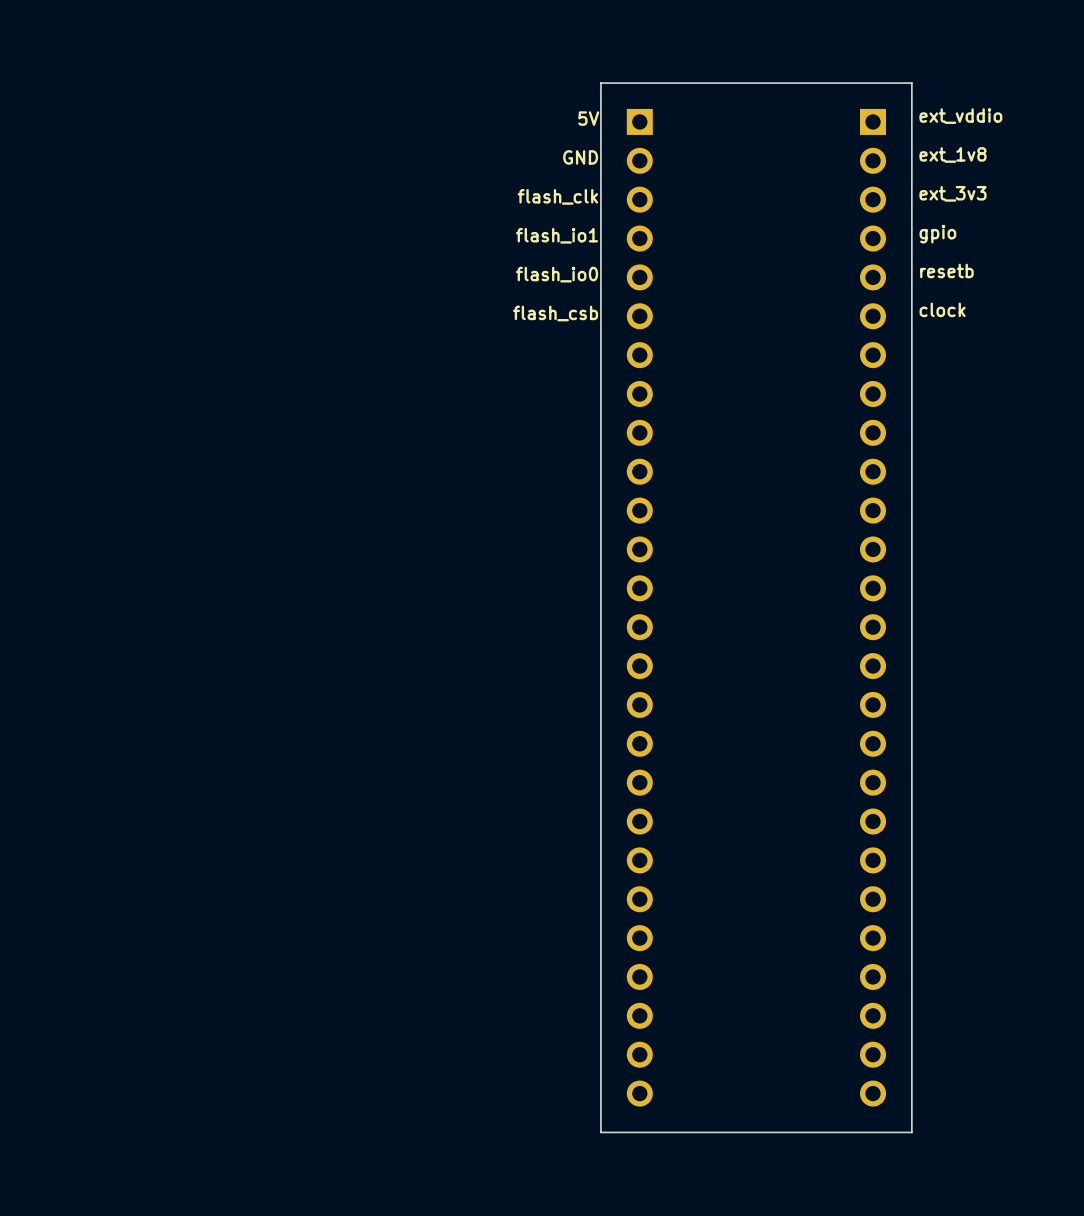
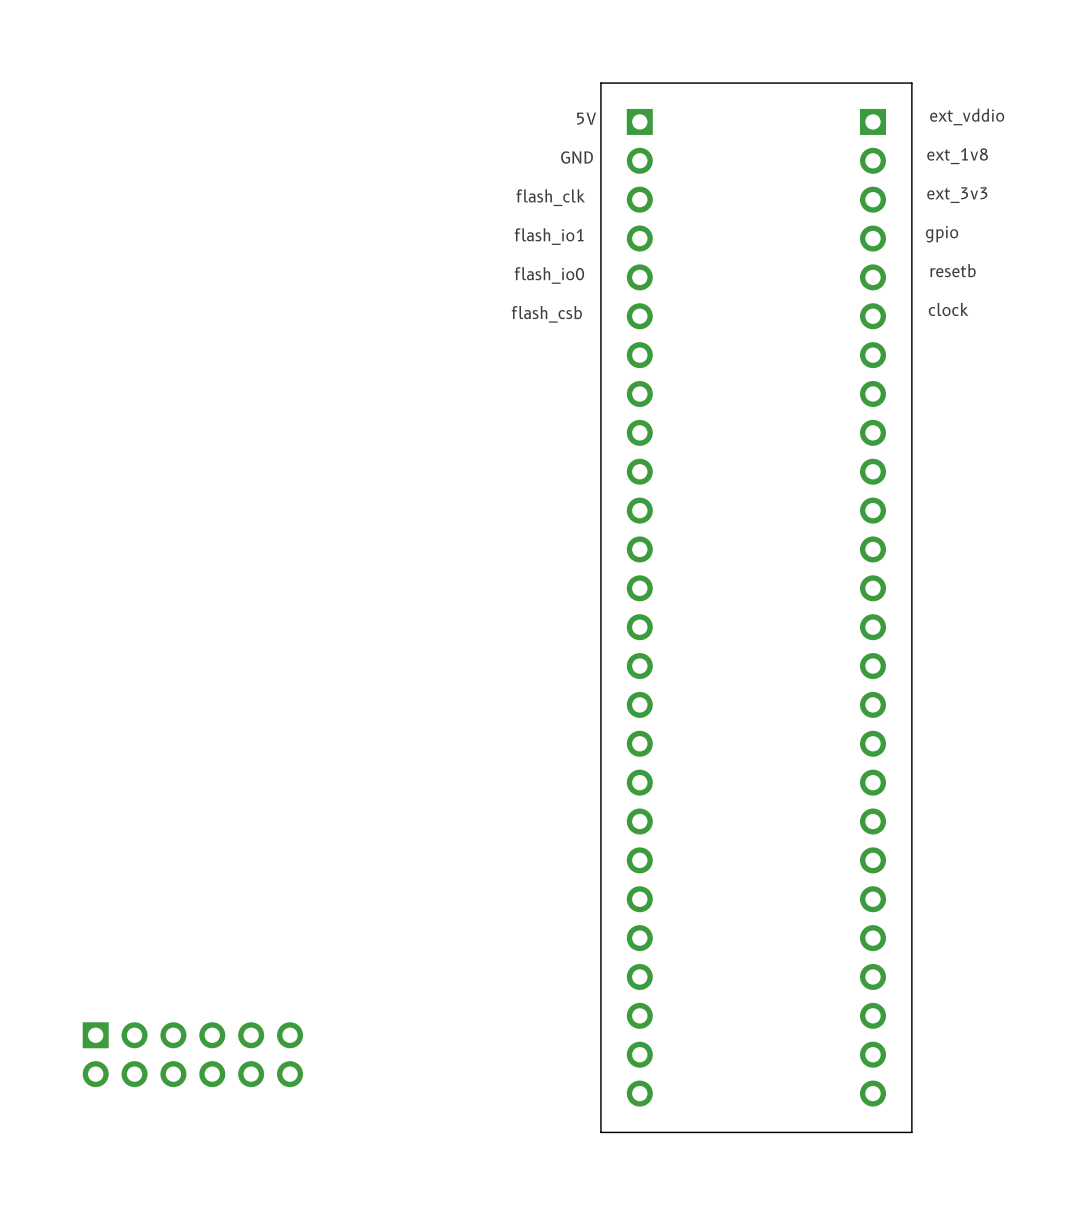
part: none -> (192, 1054)

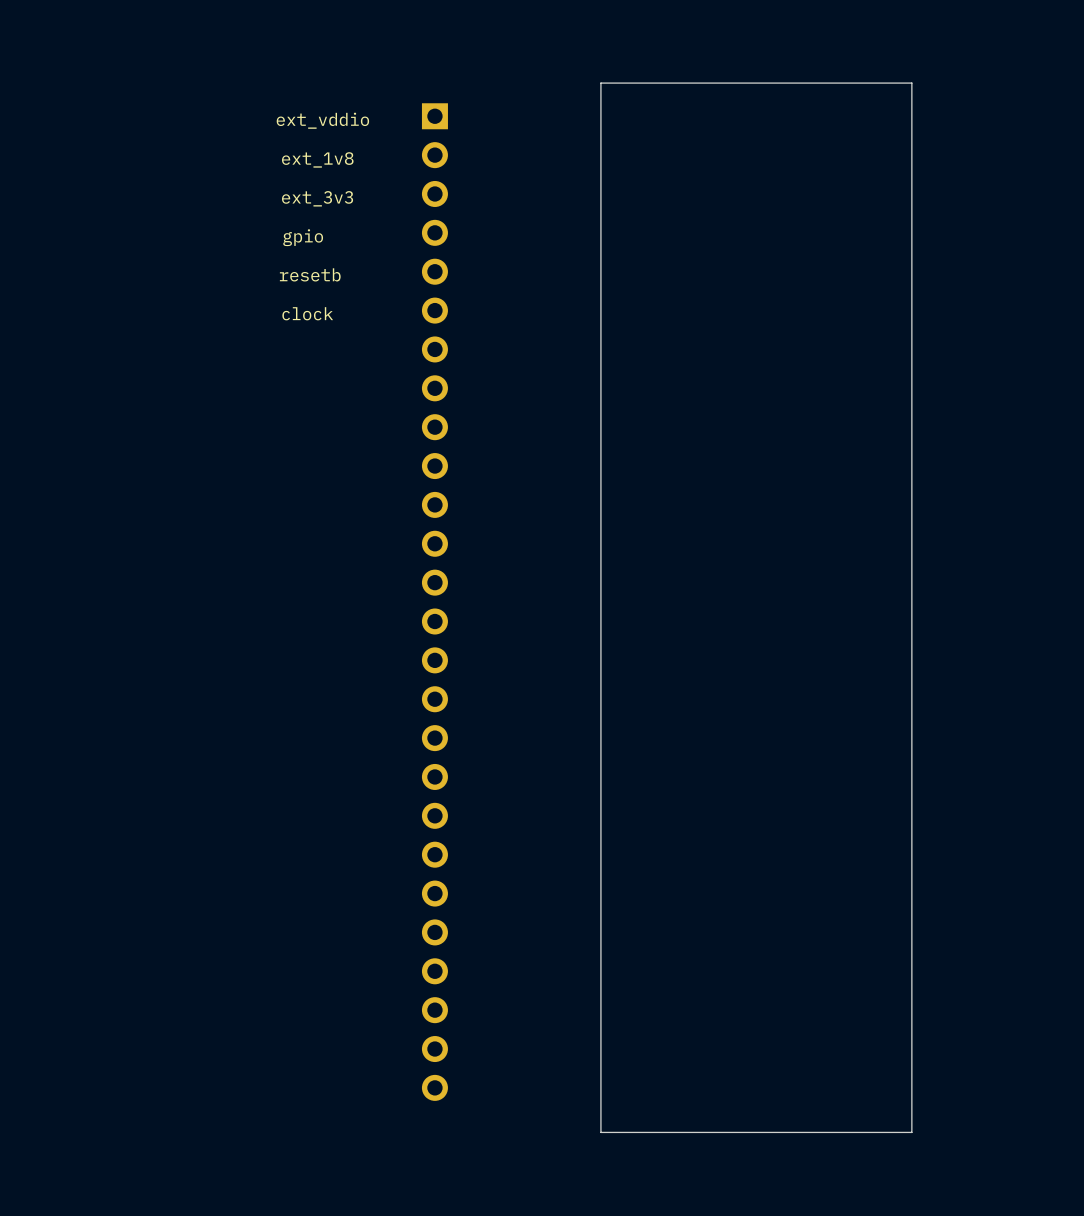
text: ext_vddio (967, 116) -> none
text: 5V (586, 118) -> none
text: none -> ext_vddio (322, 120)
text: ext_1v8 (957, 156) -> none
text: GND (577, 157) -> none
text: none -> ext_1v8 (317, 159)
text: ext_3v3 (957, 195) -> none
text: flash_clk (550, 197) -> none
text: none -> ext_3v3 (317, 198)
text: gpio (942, 234) -> none
text: flash_io1 (549, 236) -> none
text: none -> gpio (303, 237)
text: resetb (953, 270) -> none
text: none -> resetb (310, 274)
text: flash_io0 (549, 275) -> none
text: clock (948, 309) -> none
text: none -> clock (307, 313)
text: flash_csb (546, 314) -> none
part position: (639, 607) -> (434, 602)
part: (873, 607) -> none
part: (192, 1054) -> none

